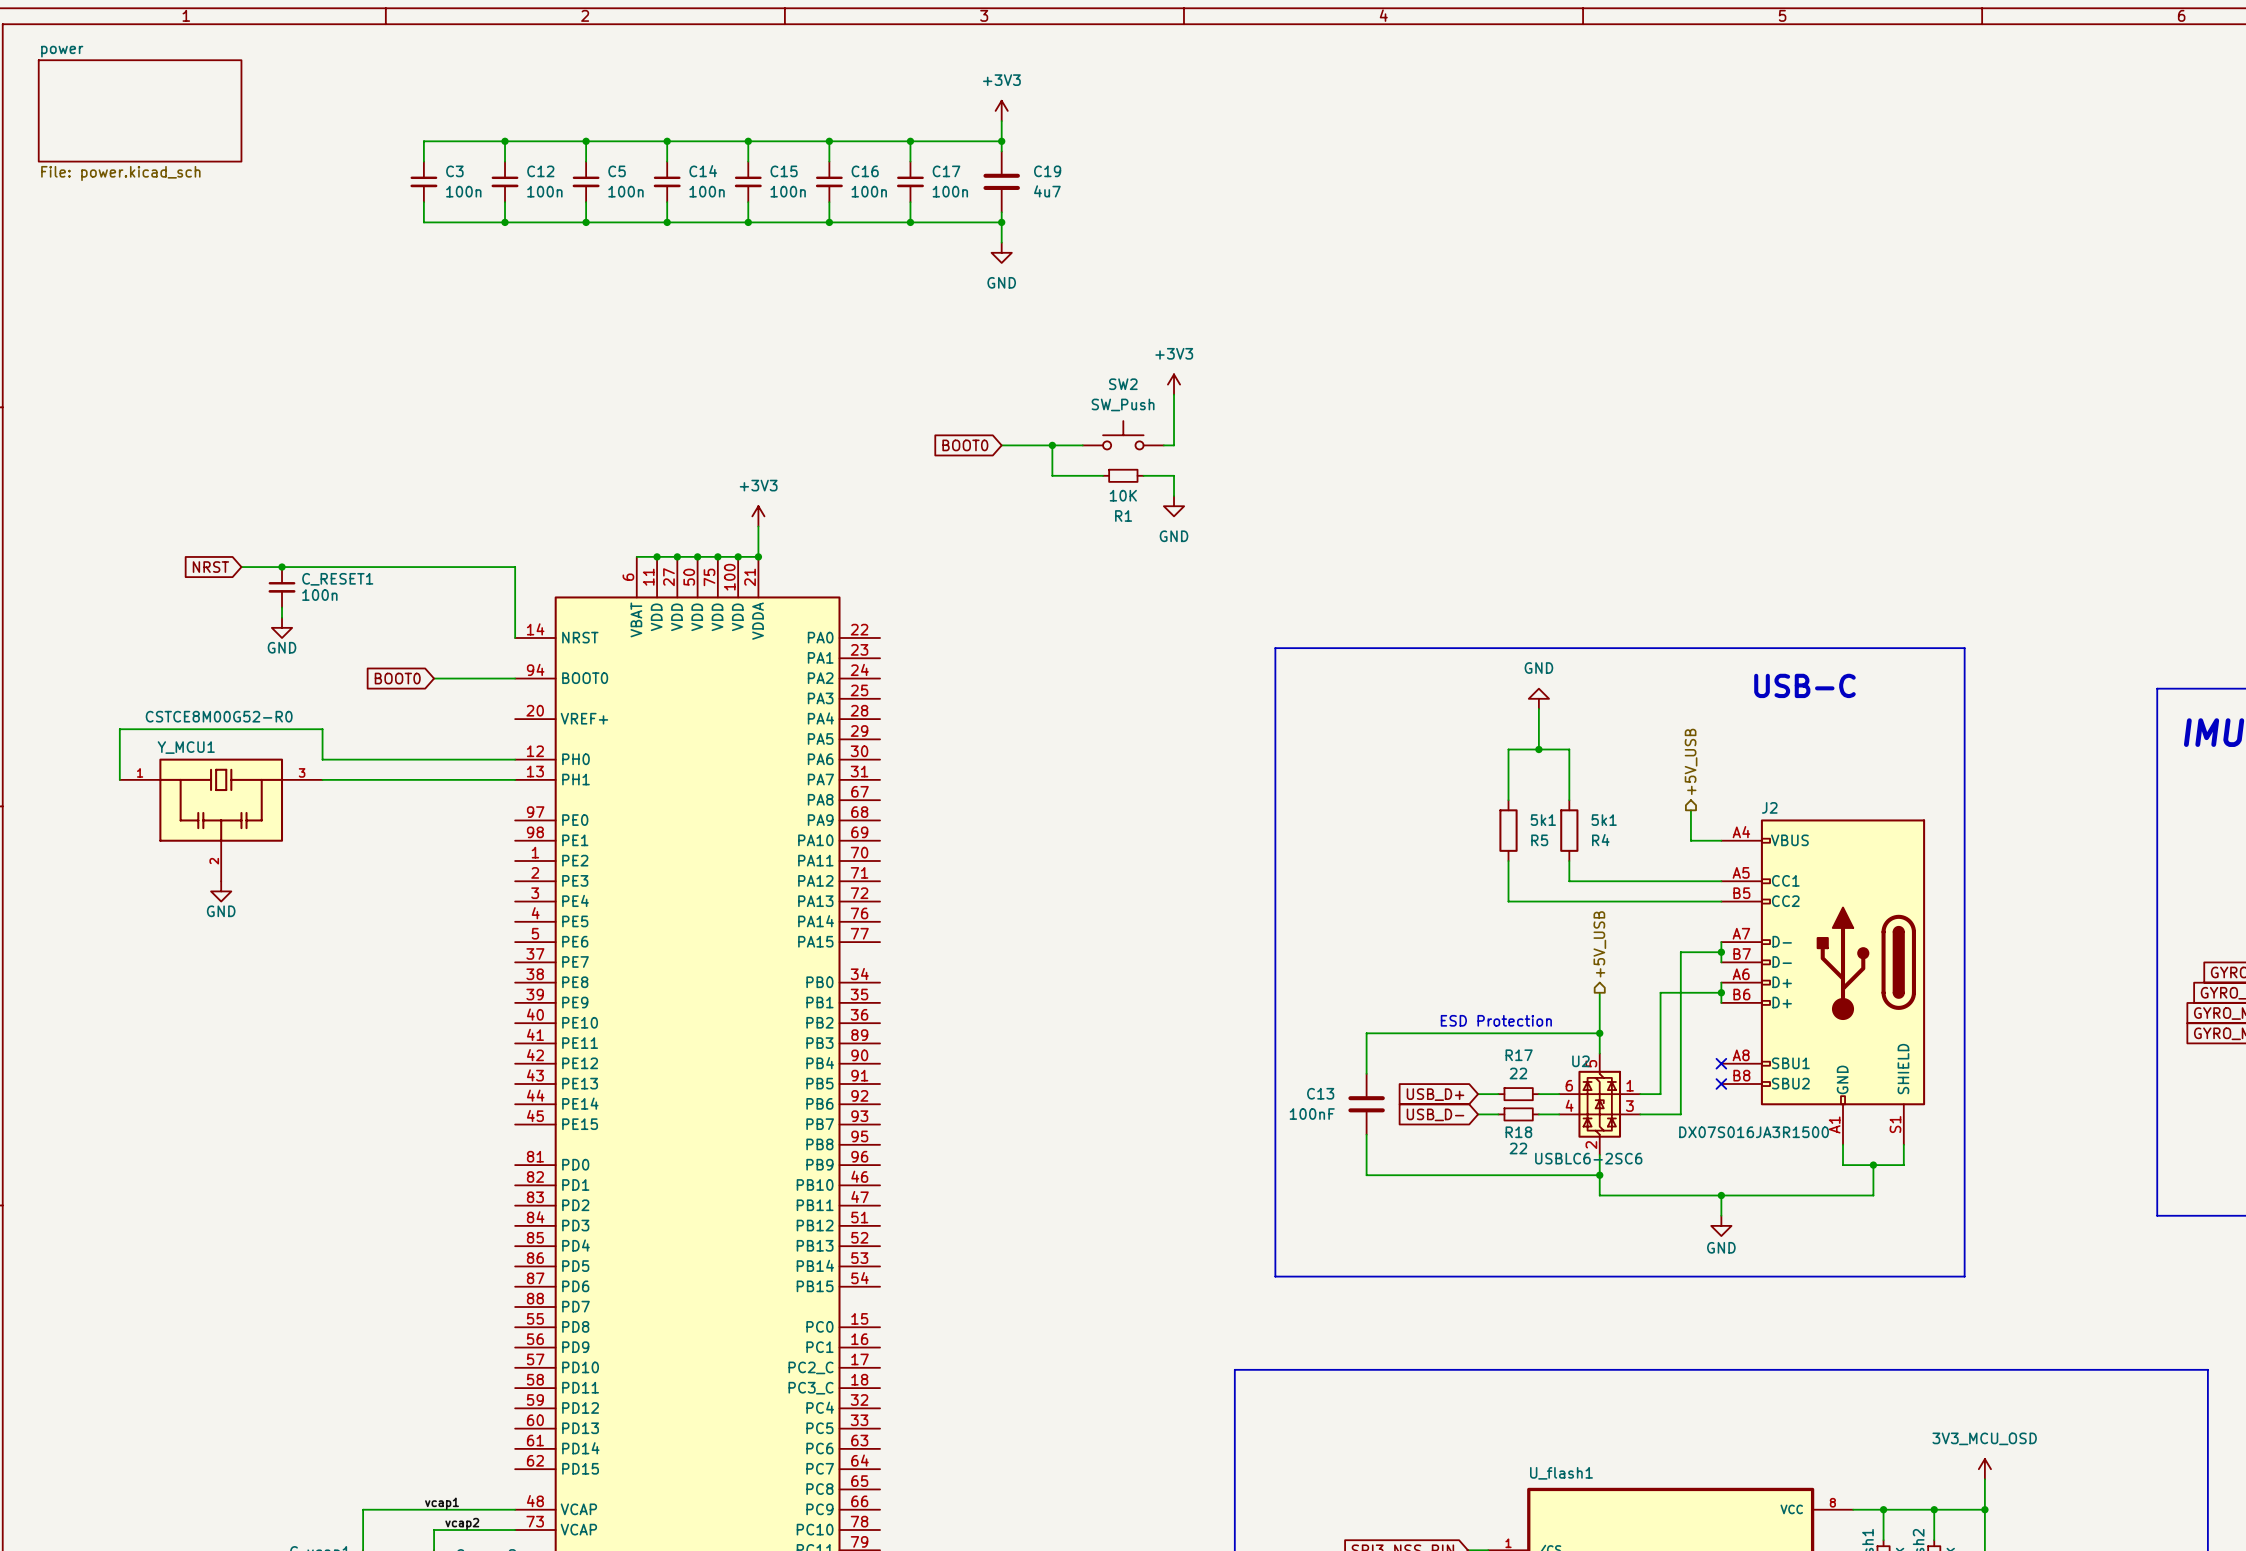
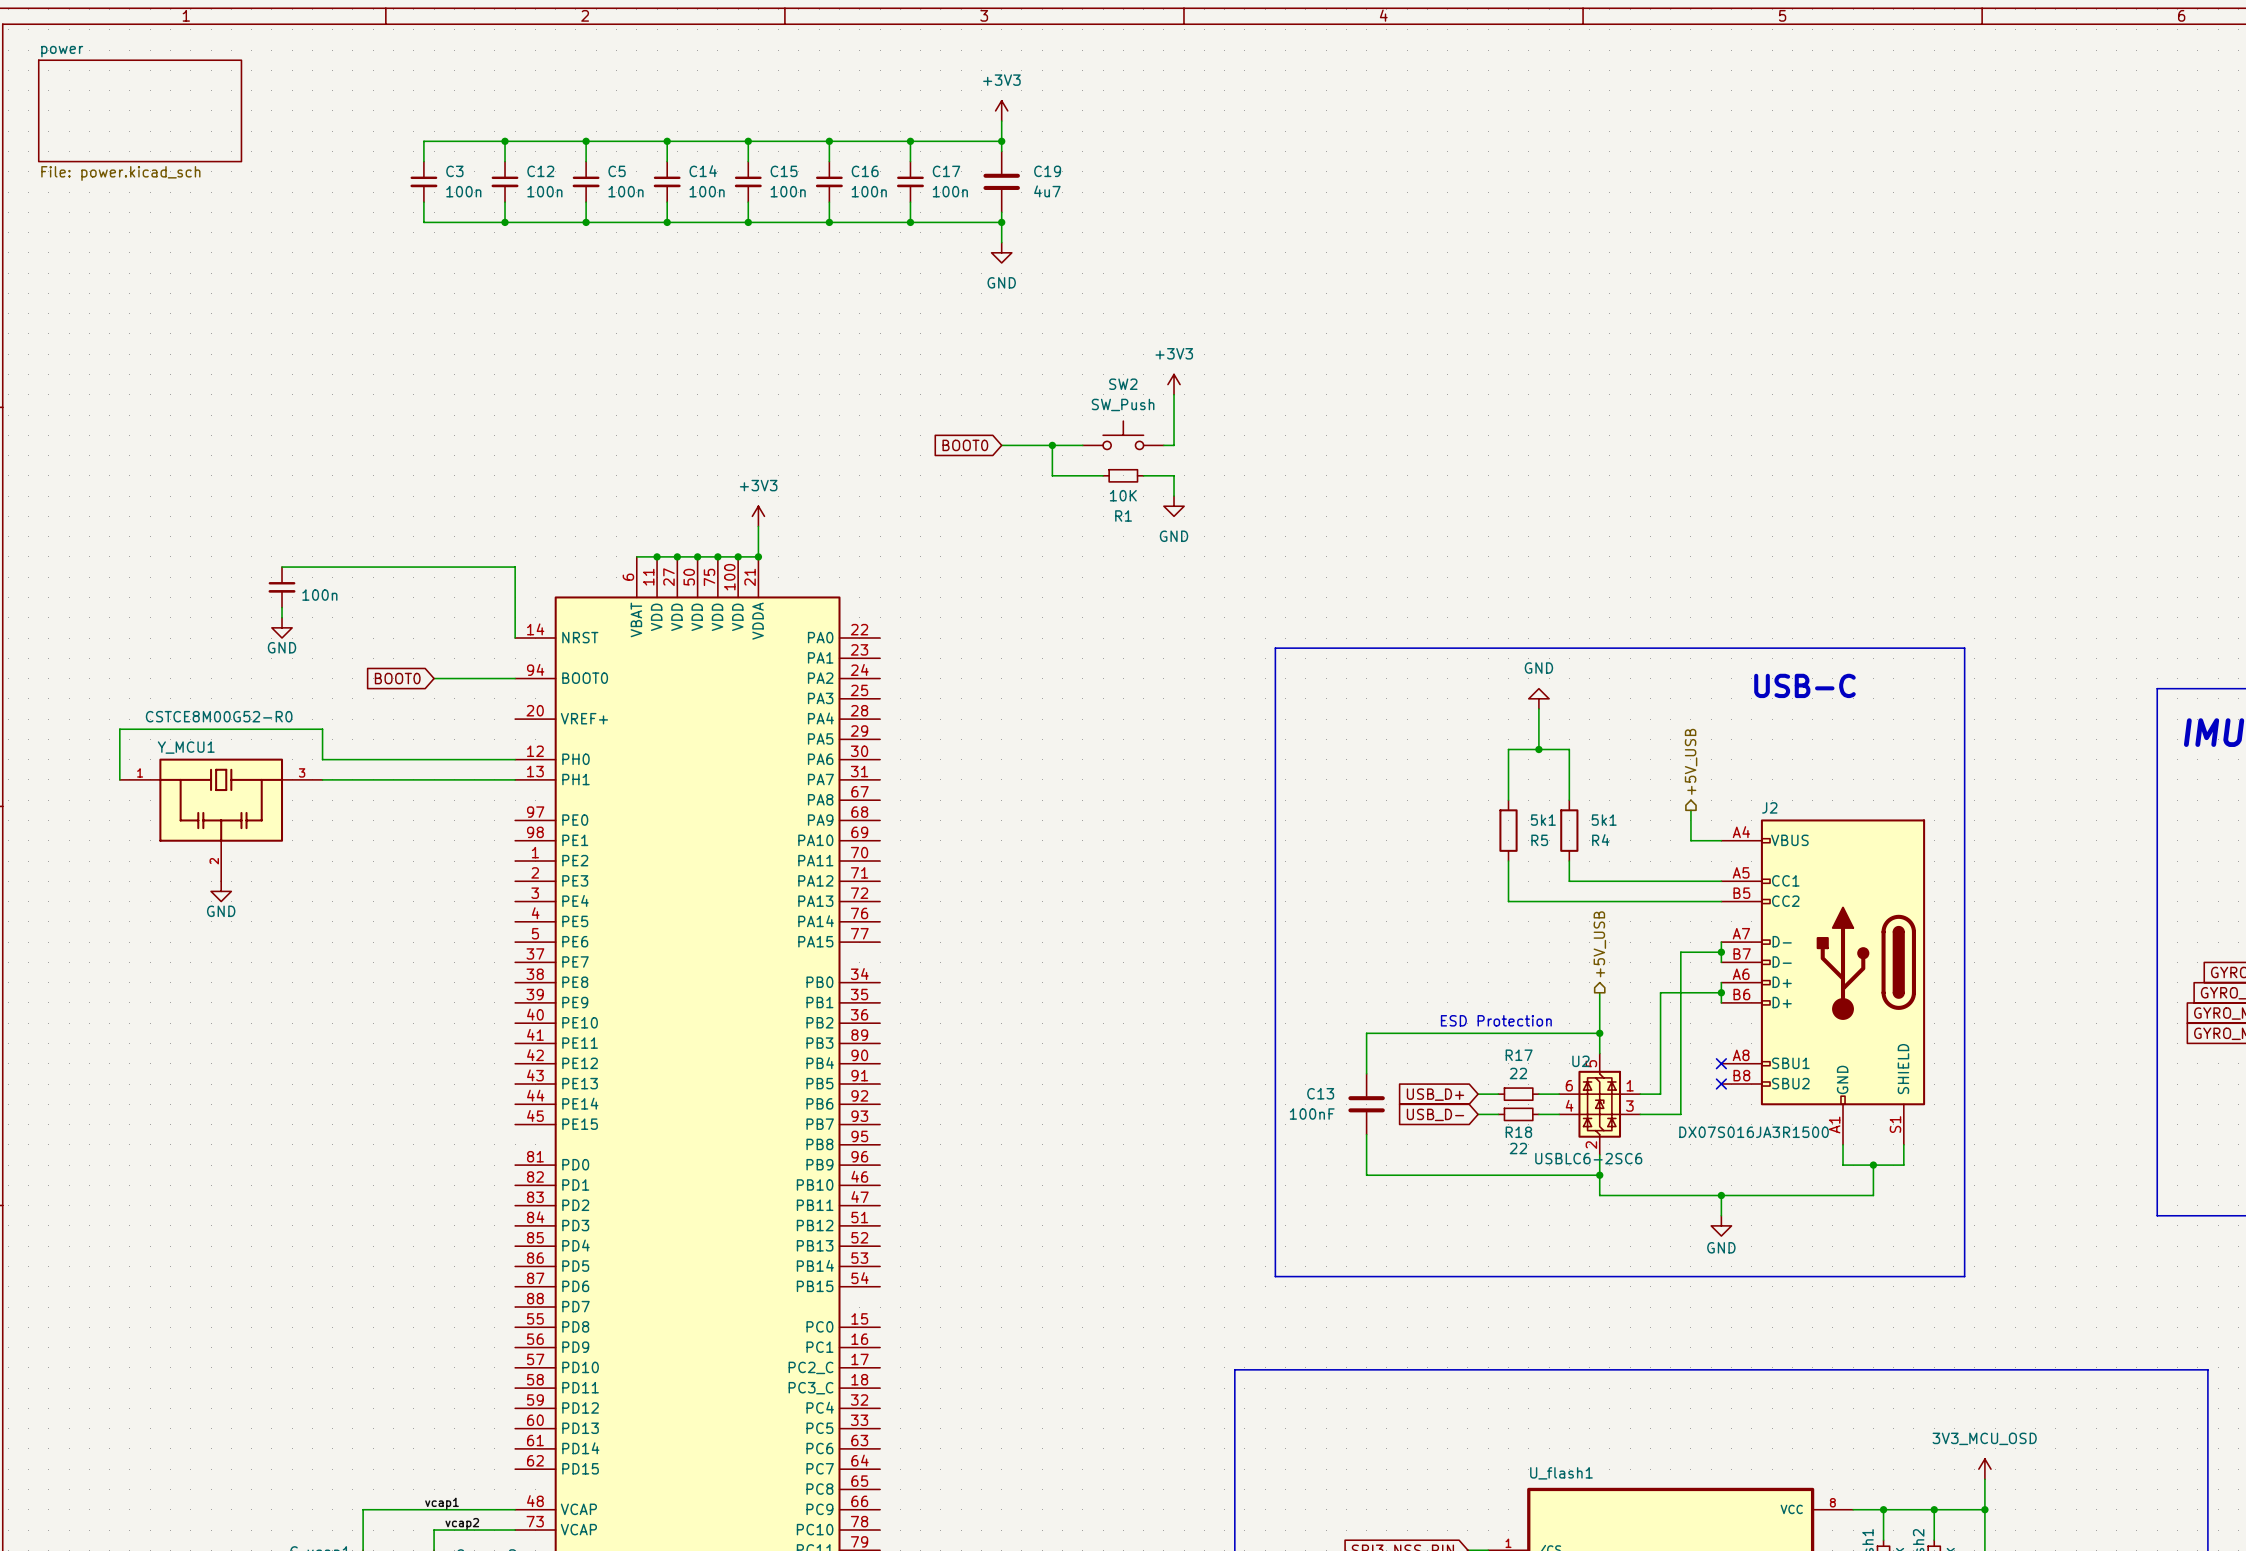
global label: NRST (210, 567) -> none
wire: (241, 567) (282, 567) -> none
junction: (282, 567) -> none
C_RESET1 name: C_RESET1 (337, 579) -> none

